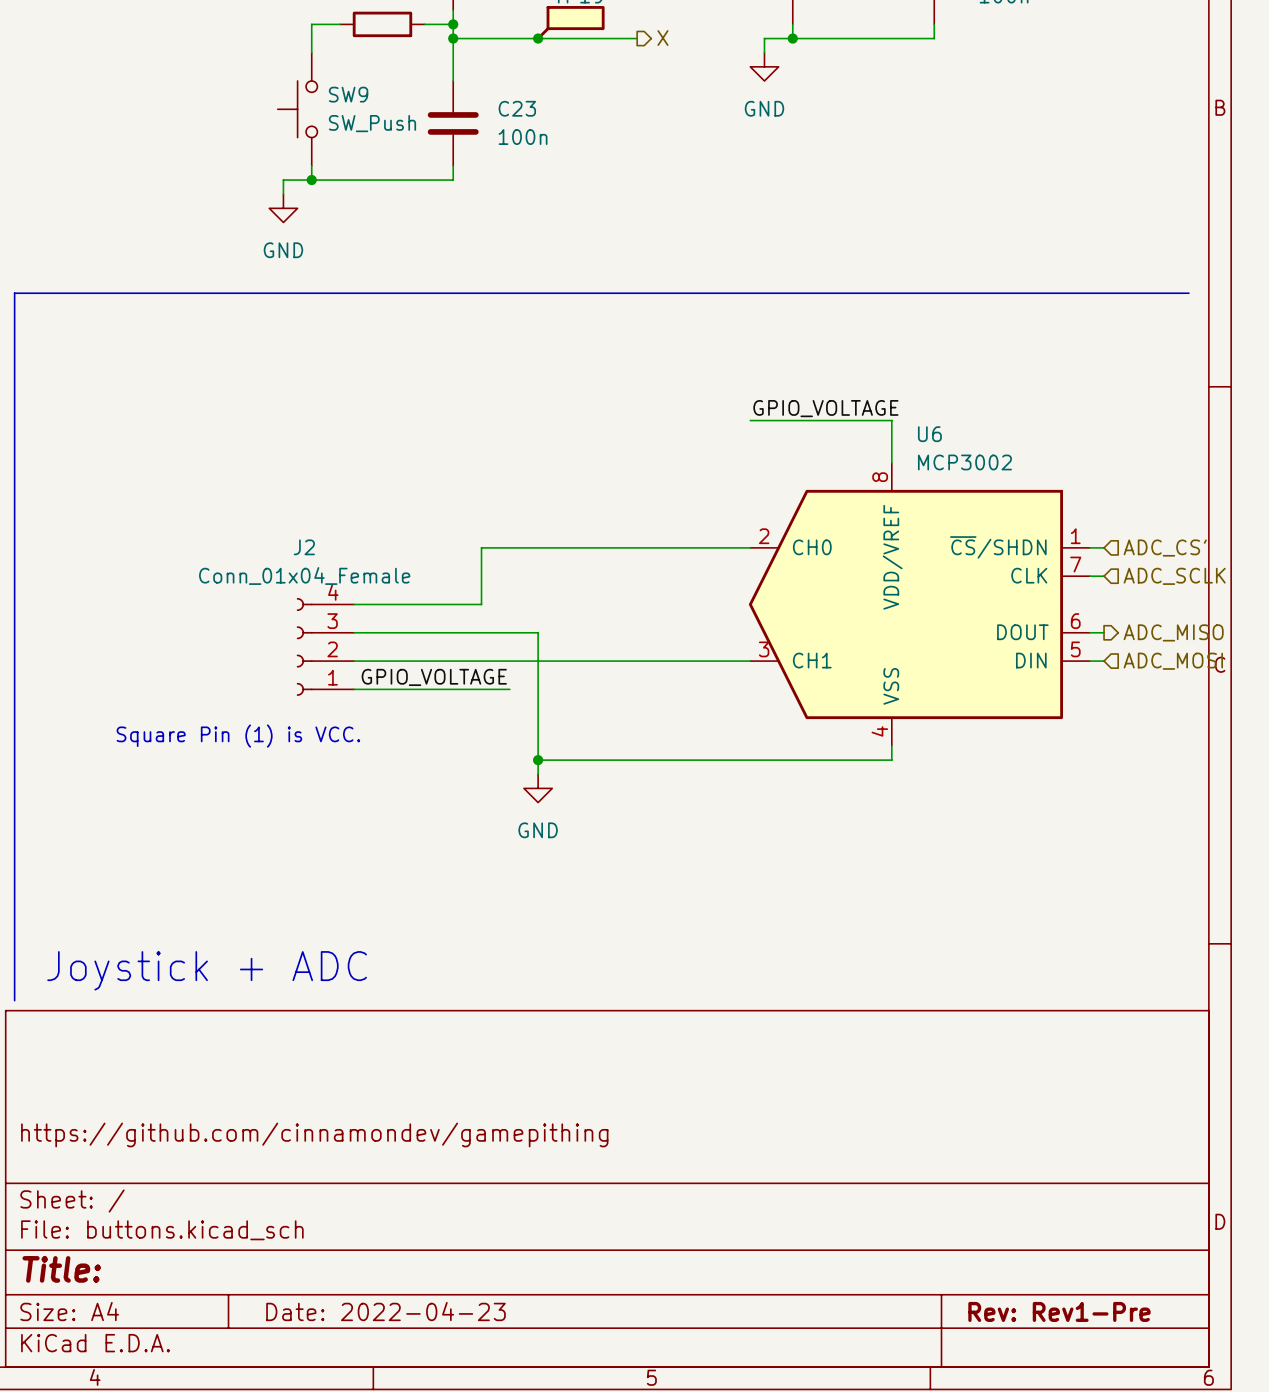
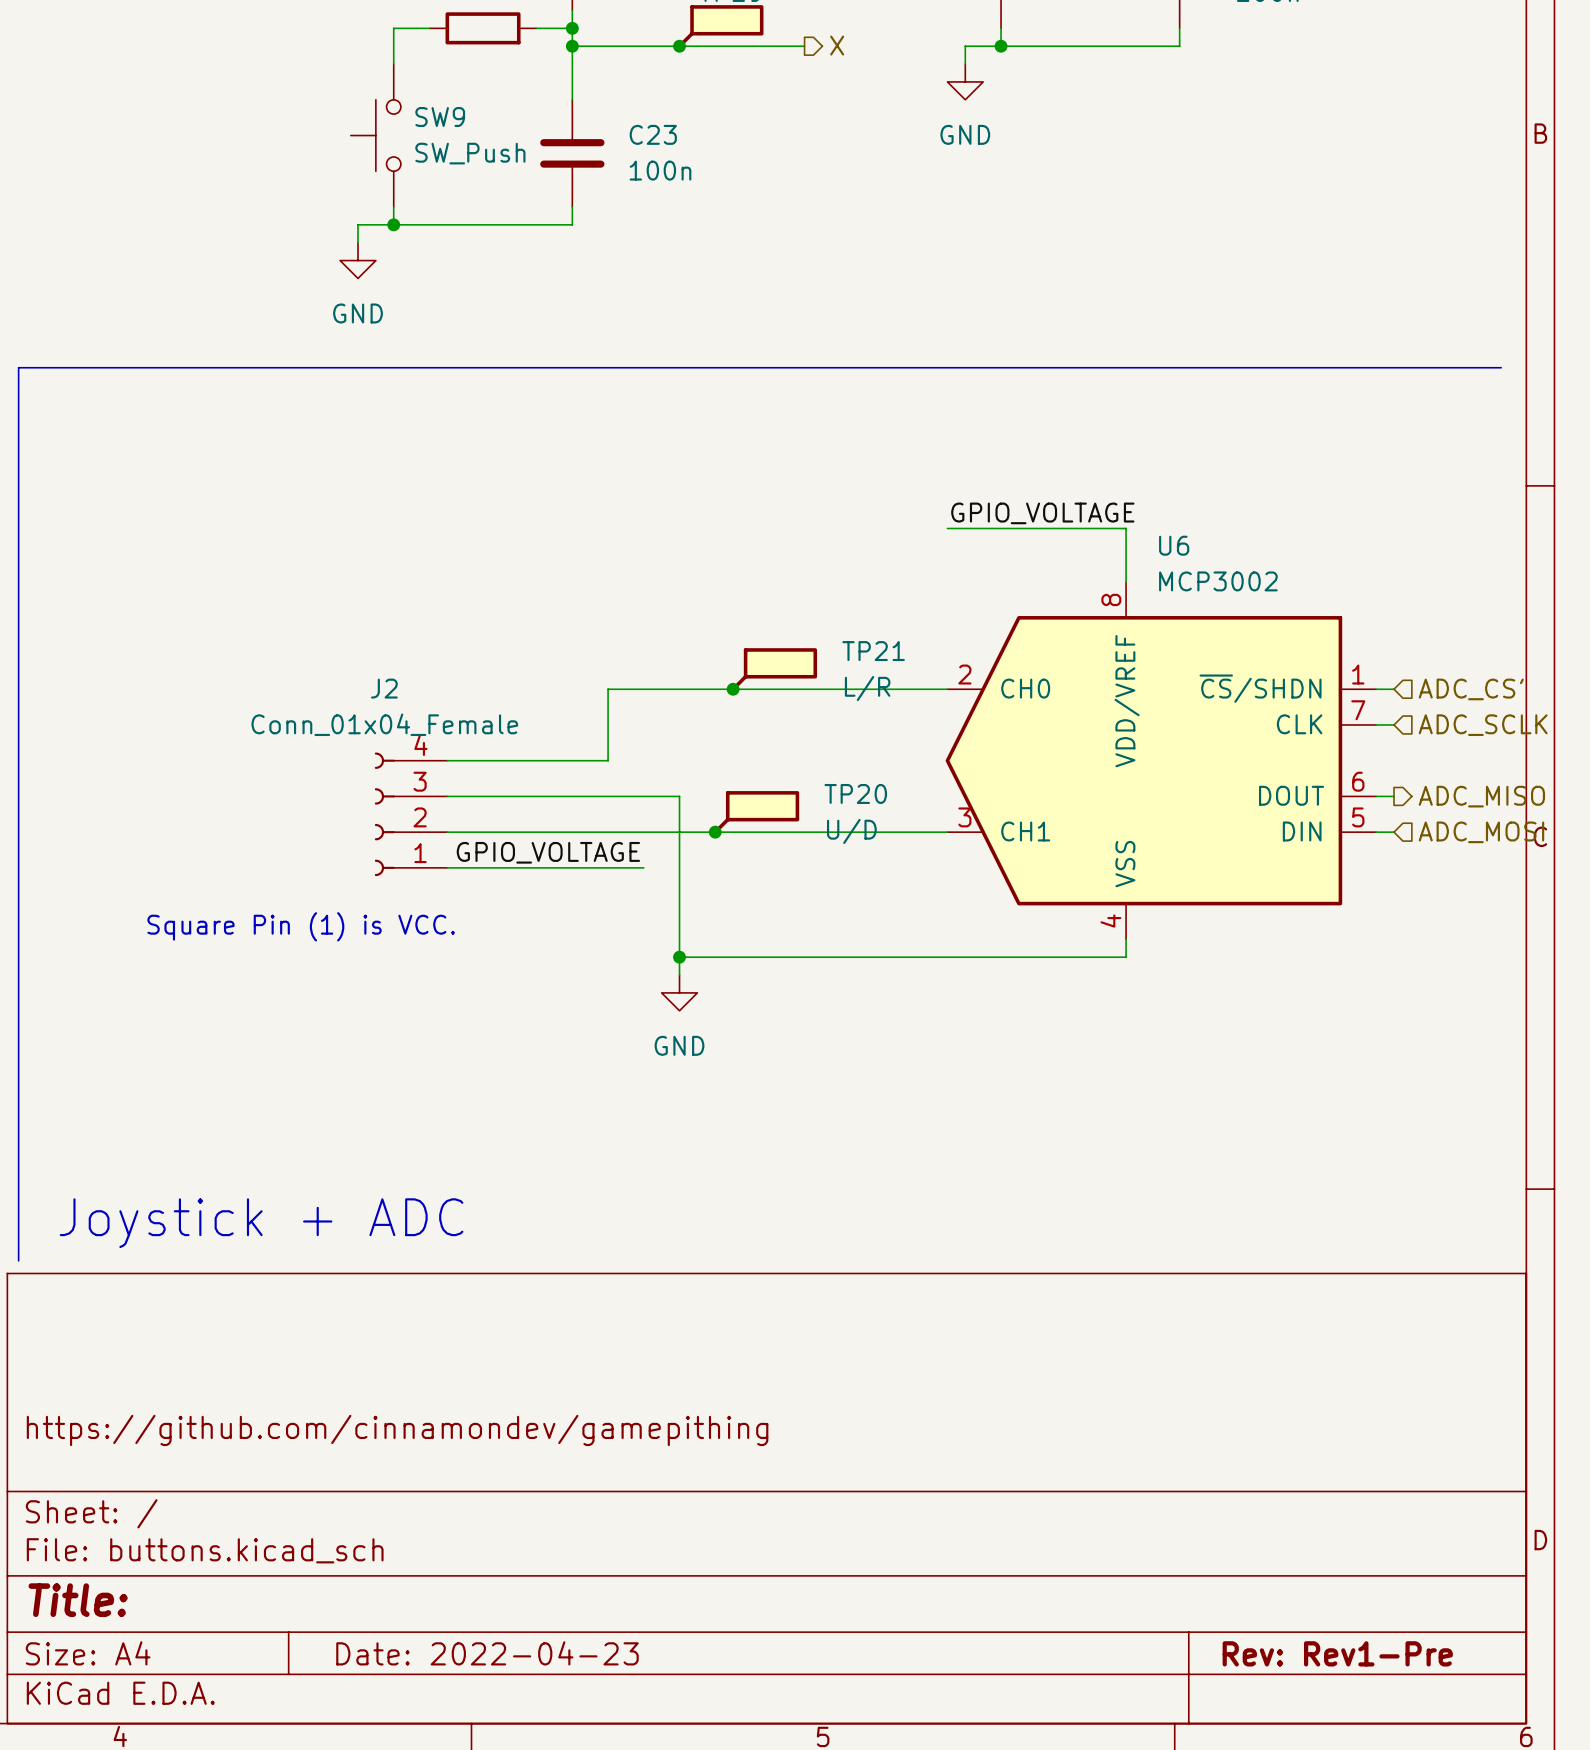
TP21: none -> L/R (774, 669)
junction: none -> (733, 689)
TP20: none -> U/D (756, 812)
junction: none -> (715, 832)

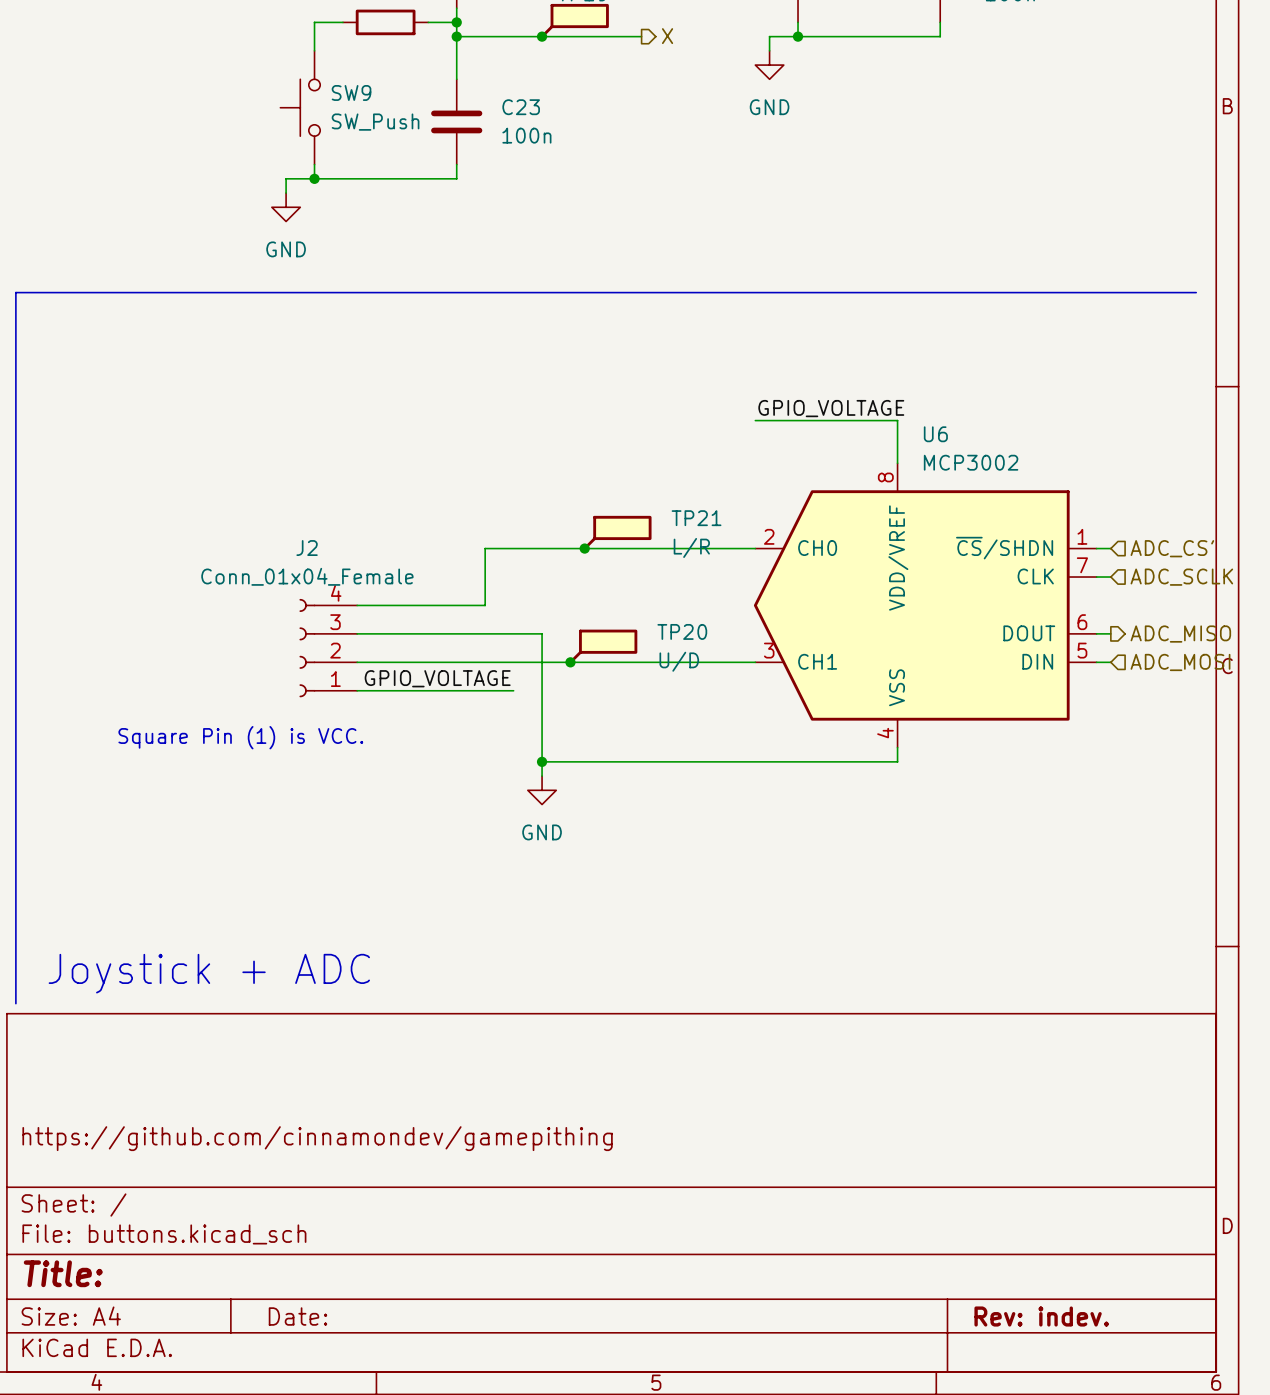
title block: Date: 2022-04-23 (487, 1653) -> Date: (297, 1316)
title block: Rev: Rev1-Pre (1337, 1653) -> Rev: indev. (1041, 1316)

